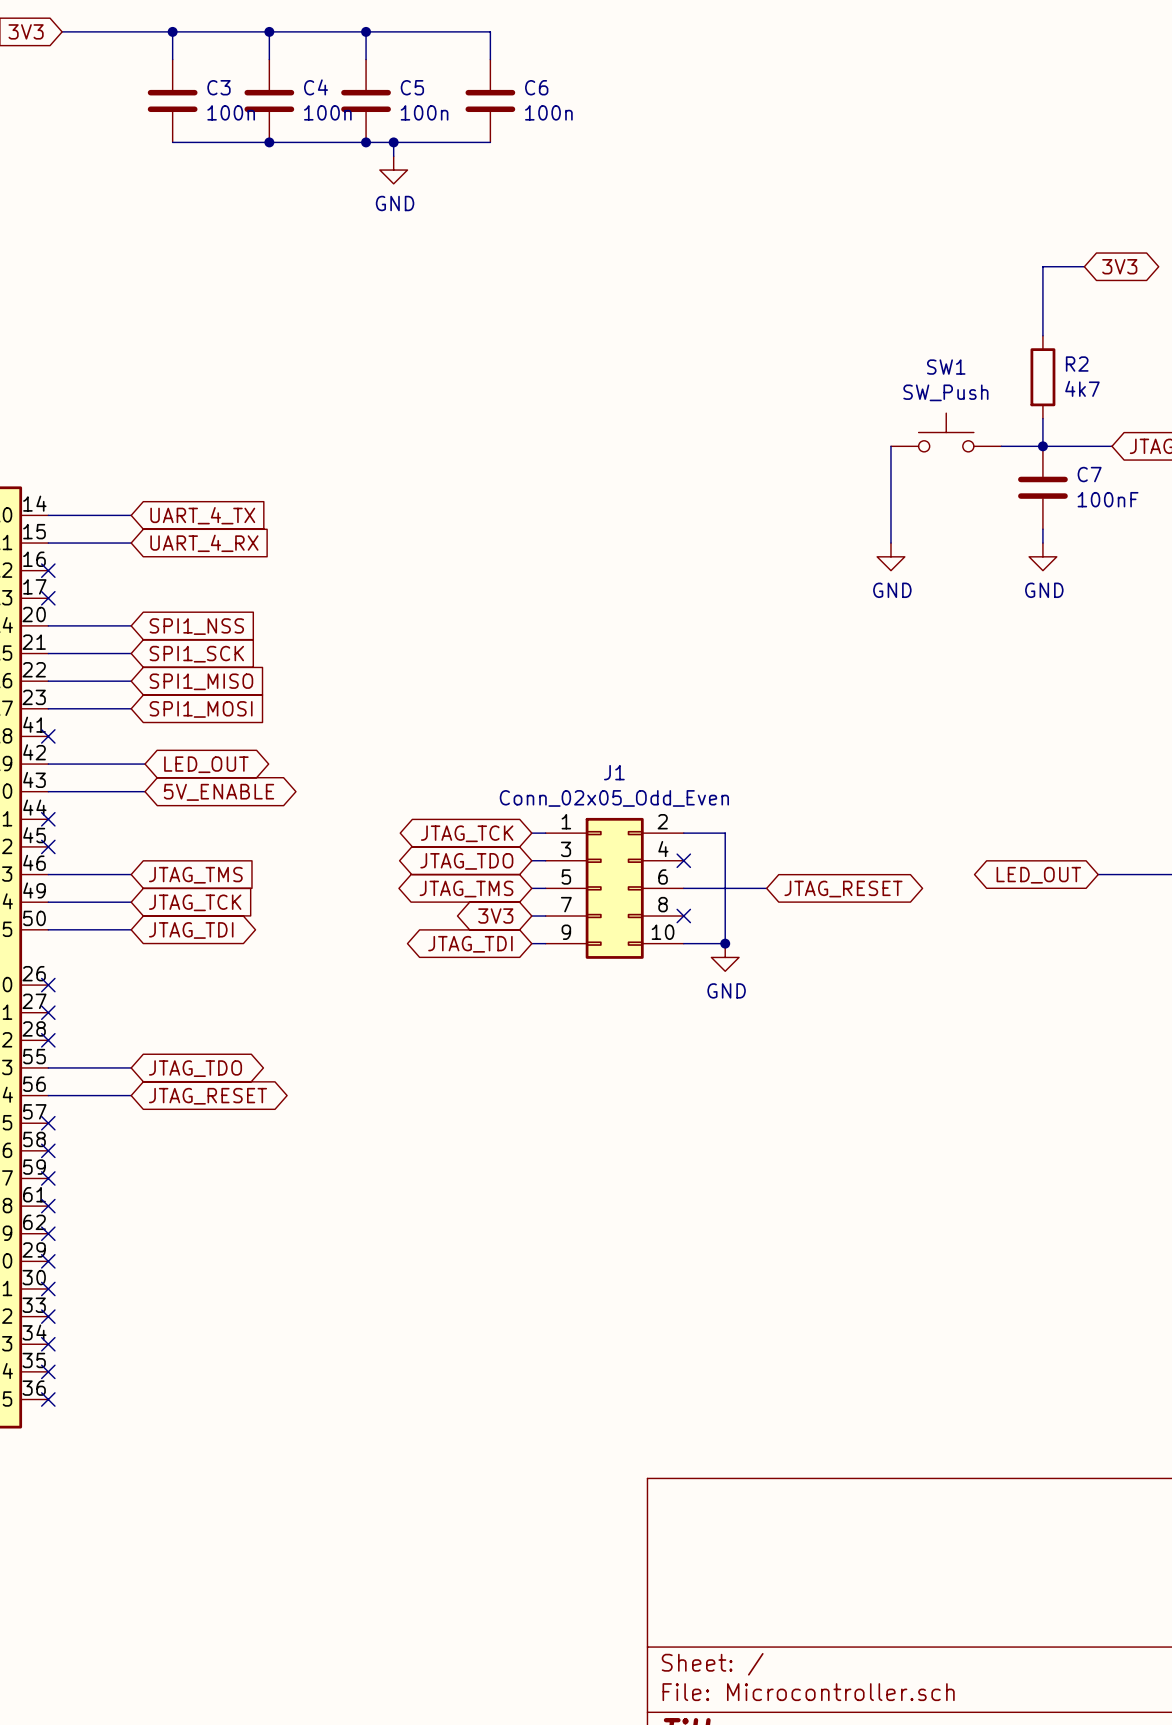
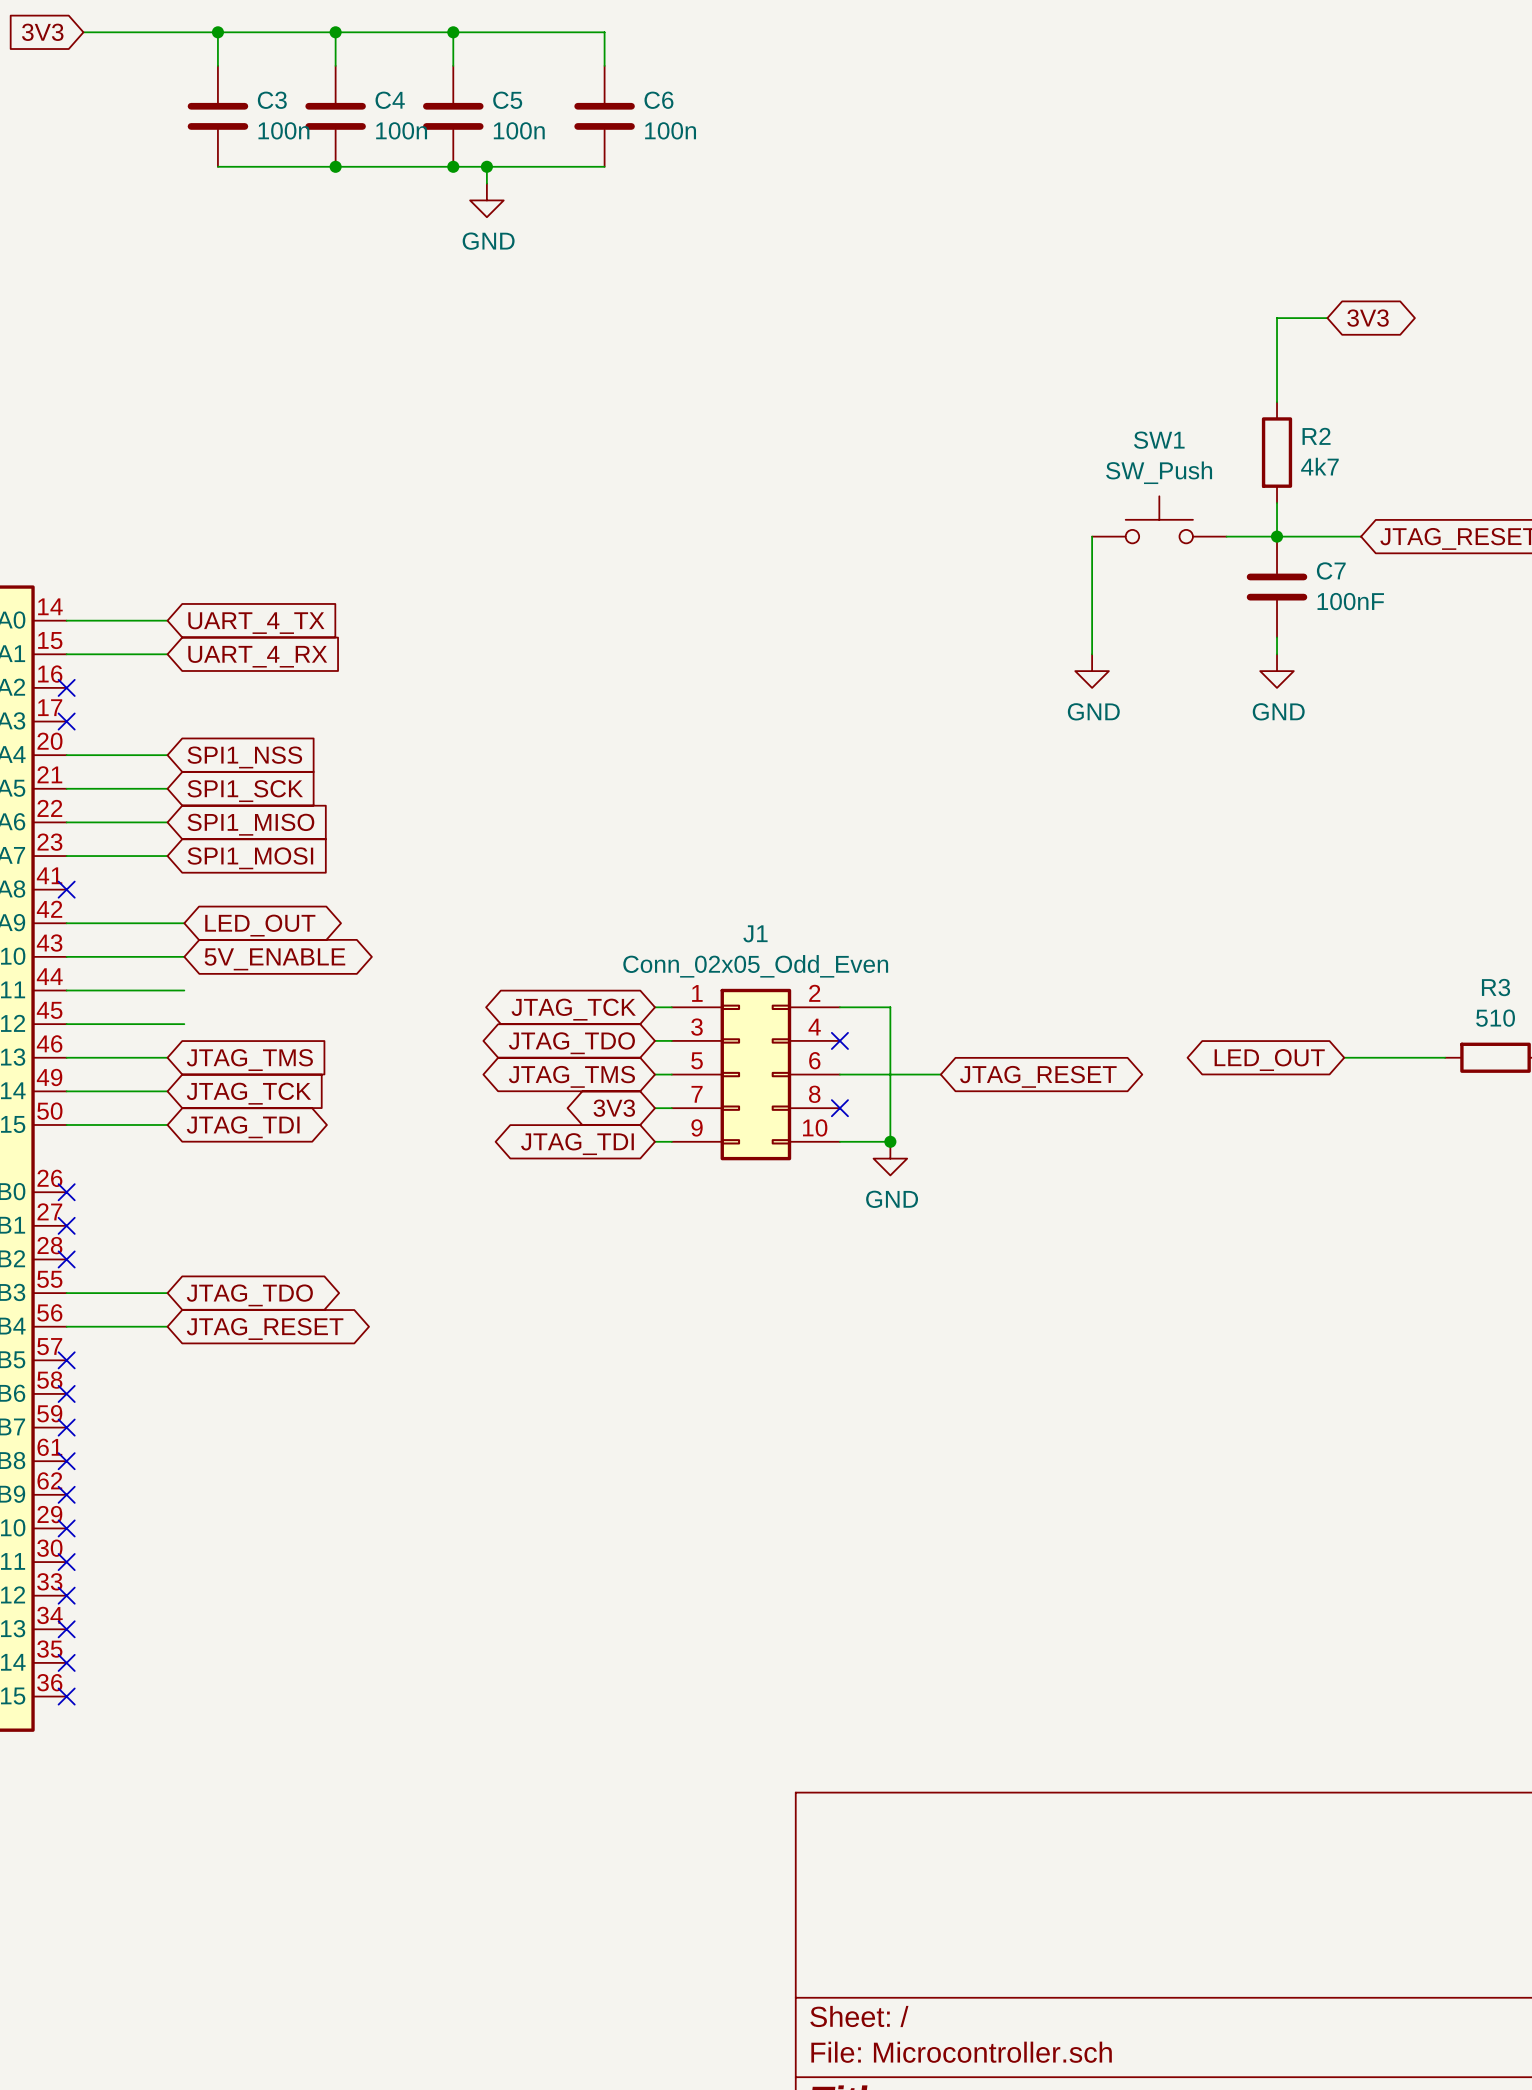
wire: none -> (66, 990) (184, 990)
no-connect mark: (48, 819) -> none
wire: none -> (66, 1024) (184, 1024)
no-connect mark: (48, 846) -> none

